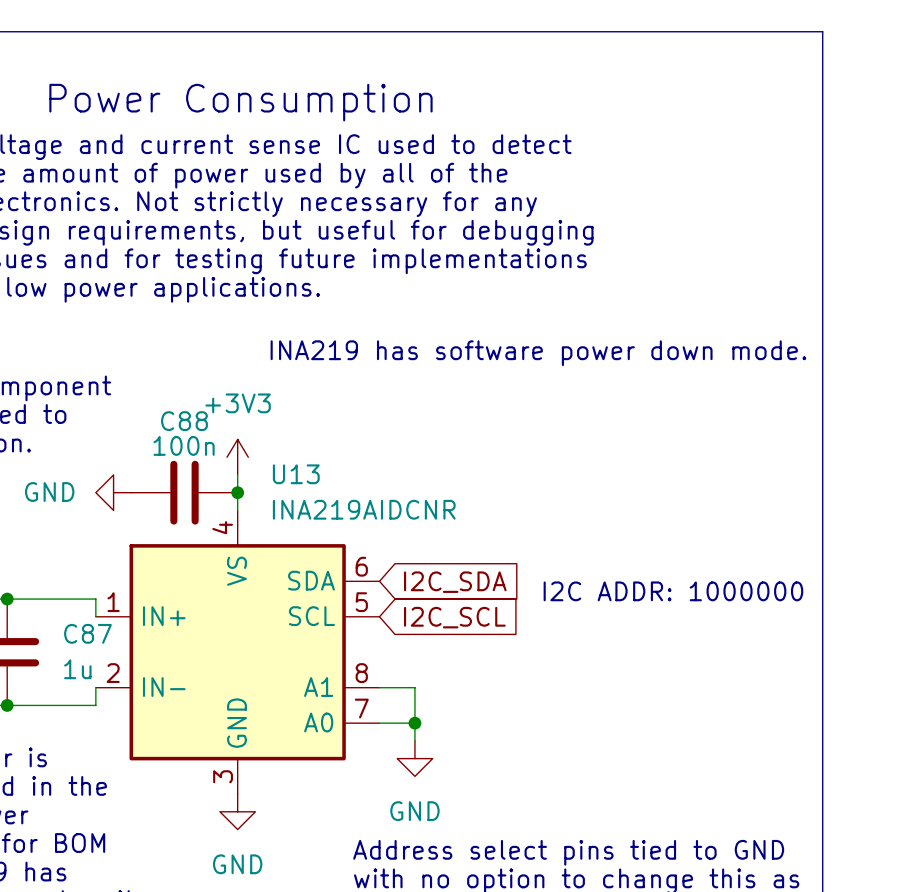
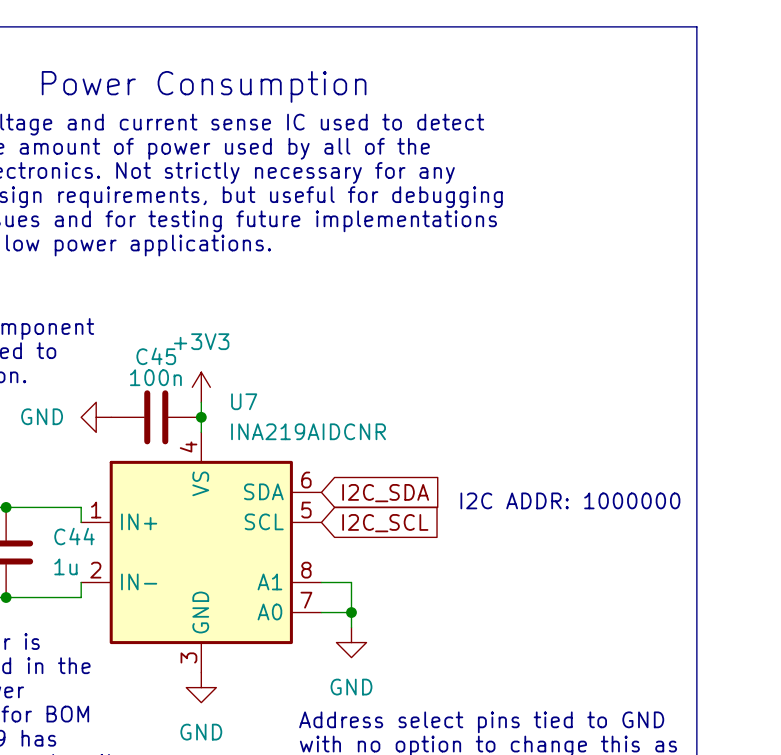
text: INA219 has software power down mode. (538, 353) -> none
C88 name: C88 (184, 421) -> C45 (156, 356)
U13 name: U13 (296, 474) -> U7 (244, 401)
C87 name: C87 (87, 633) -> C44 (74, 536)

